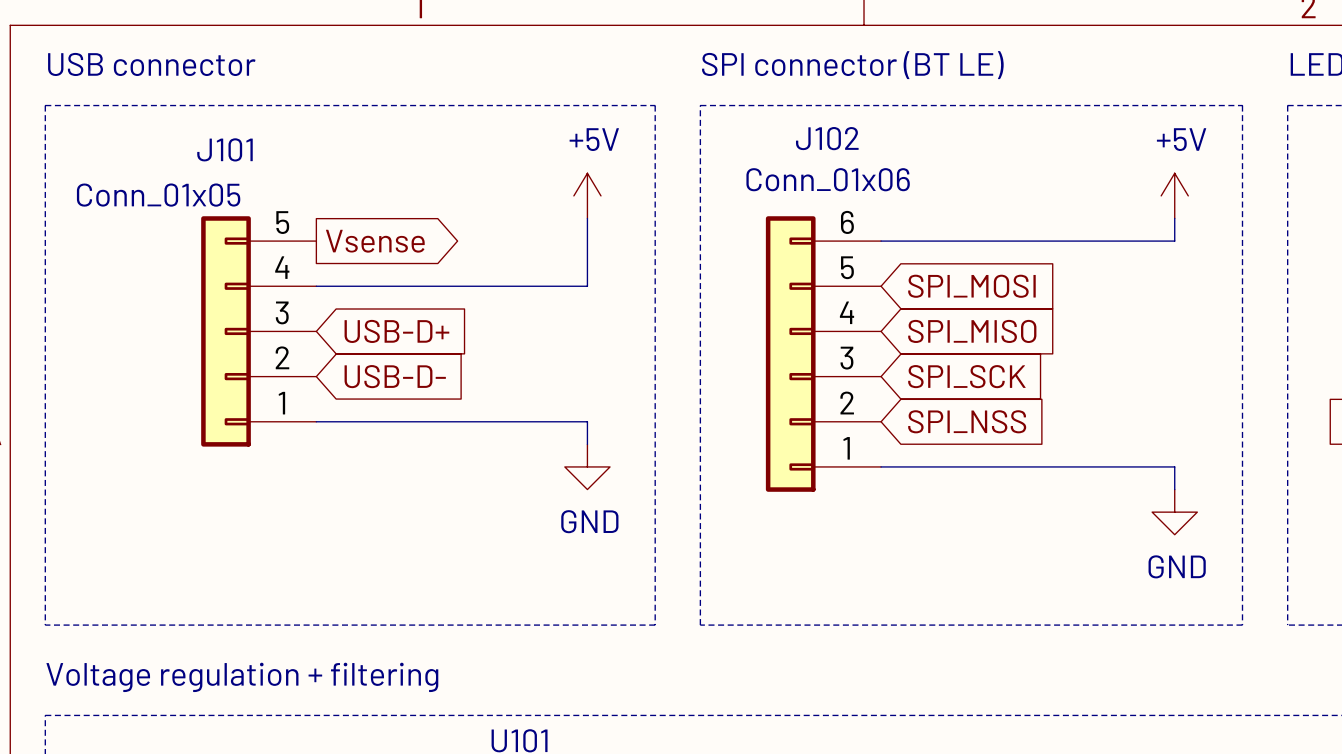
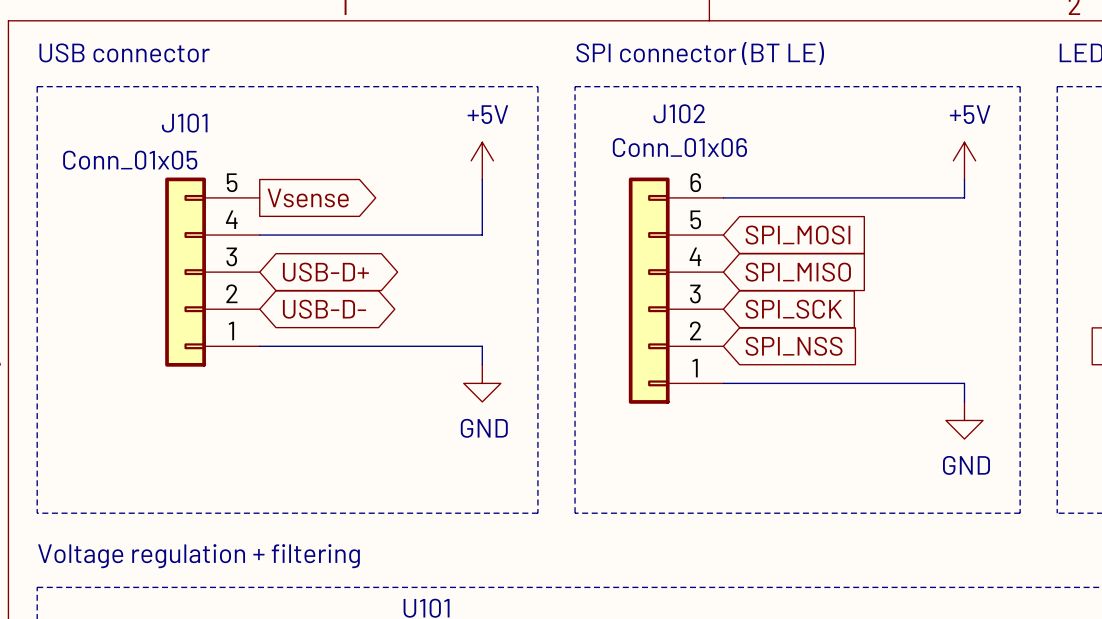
global label shape: input (396, 331) -> bidirectional (325, 272)
global label shape: input (395, 376) -> bidirectional (324, 309)

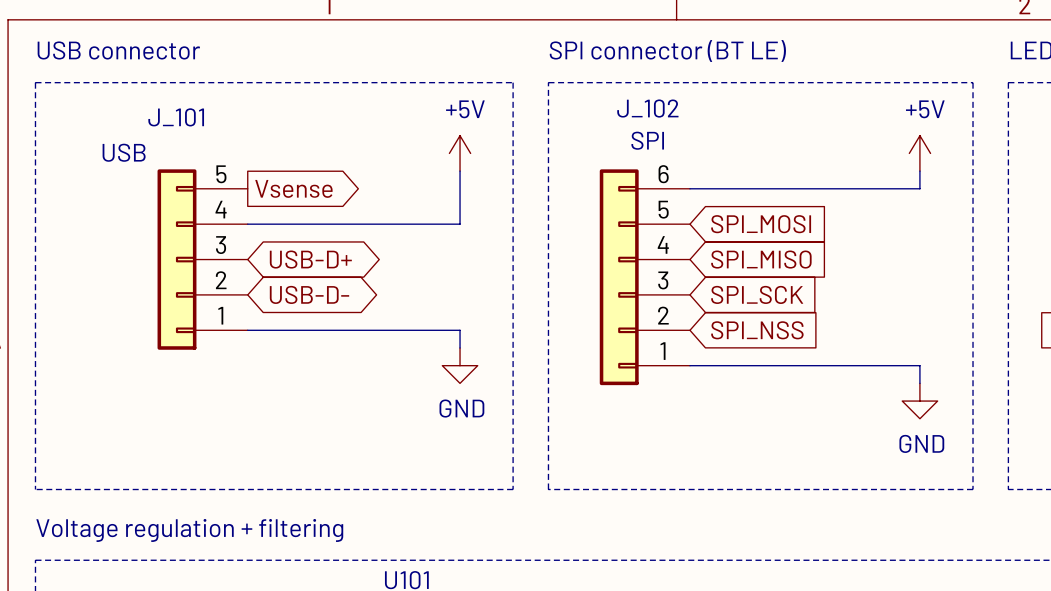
J102 name: J102 (679, 113) -> J_102 (647, 108)
J101 name: J101 (184, 123) -> J_101 (176, 117)
J102 value: Conn_01x06 (679, 147) -> SPI (647, 140)
J101 value: Conn_01x05 (130, 160) -> USB (124, 152)

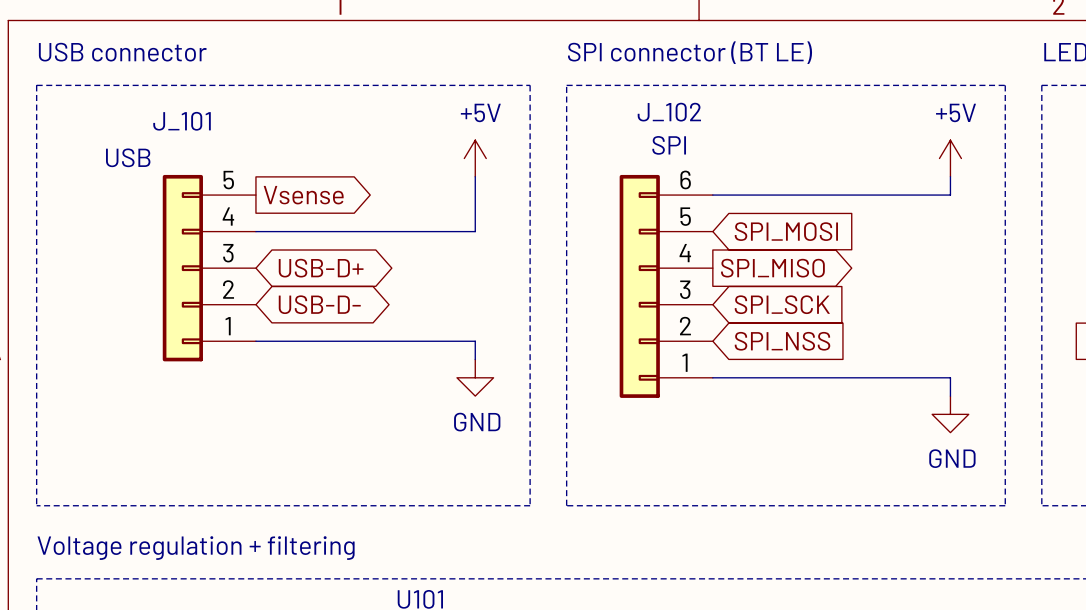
global label shape: input (761, 259) -> output (772, 268)

